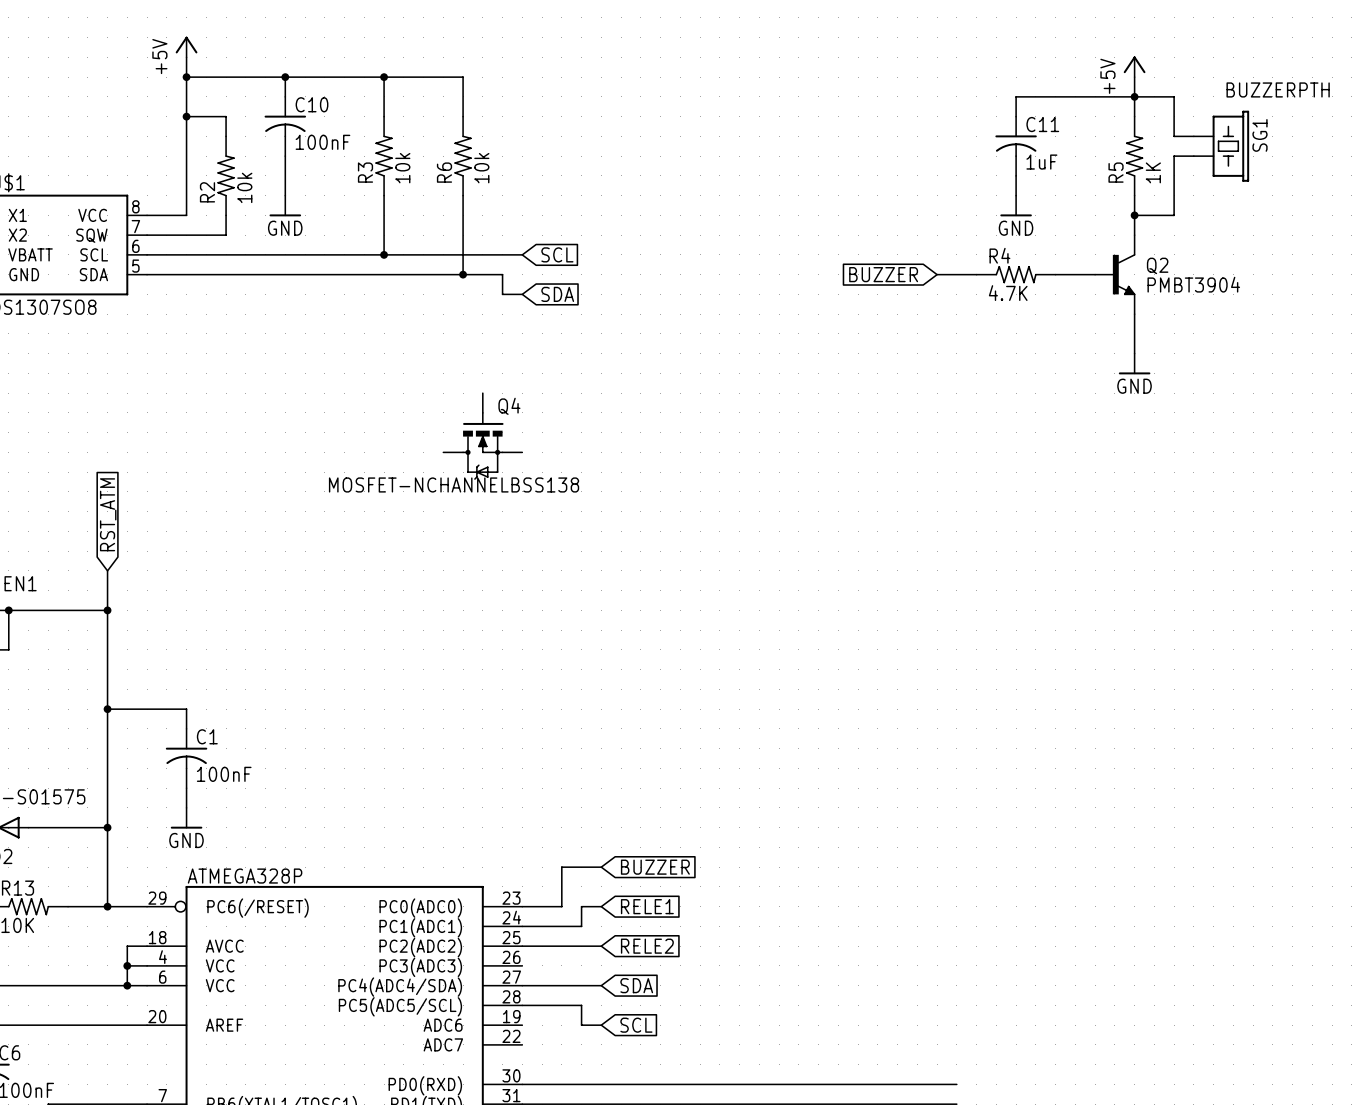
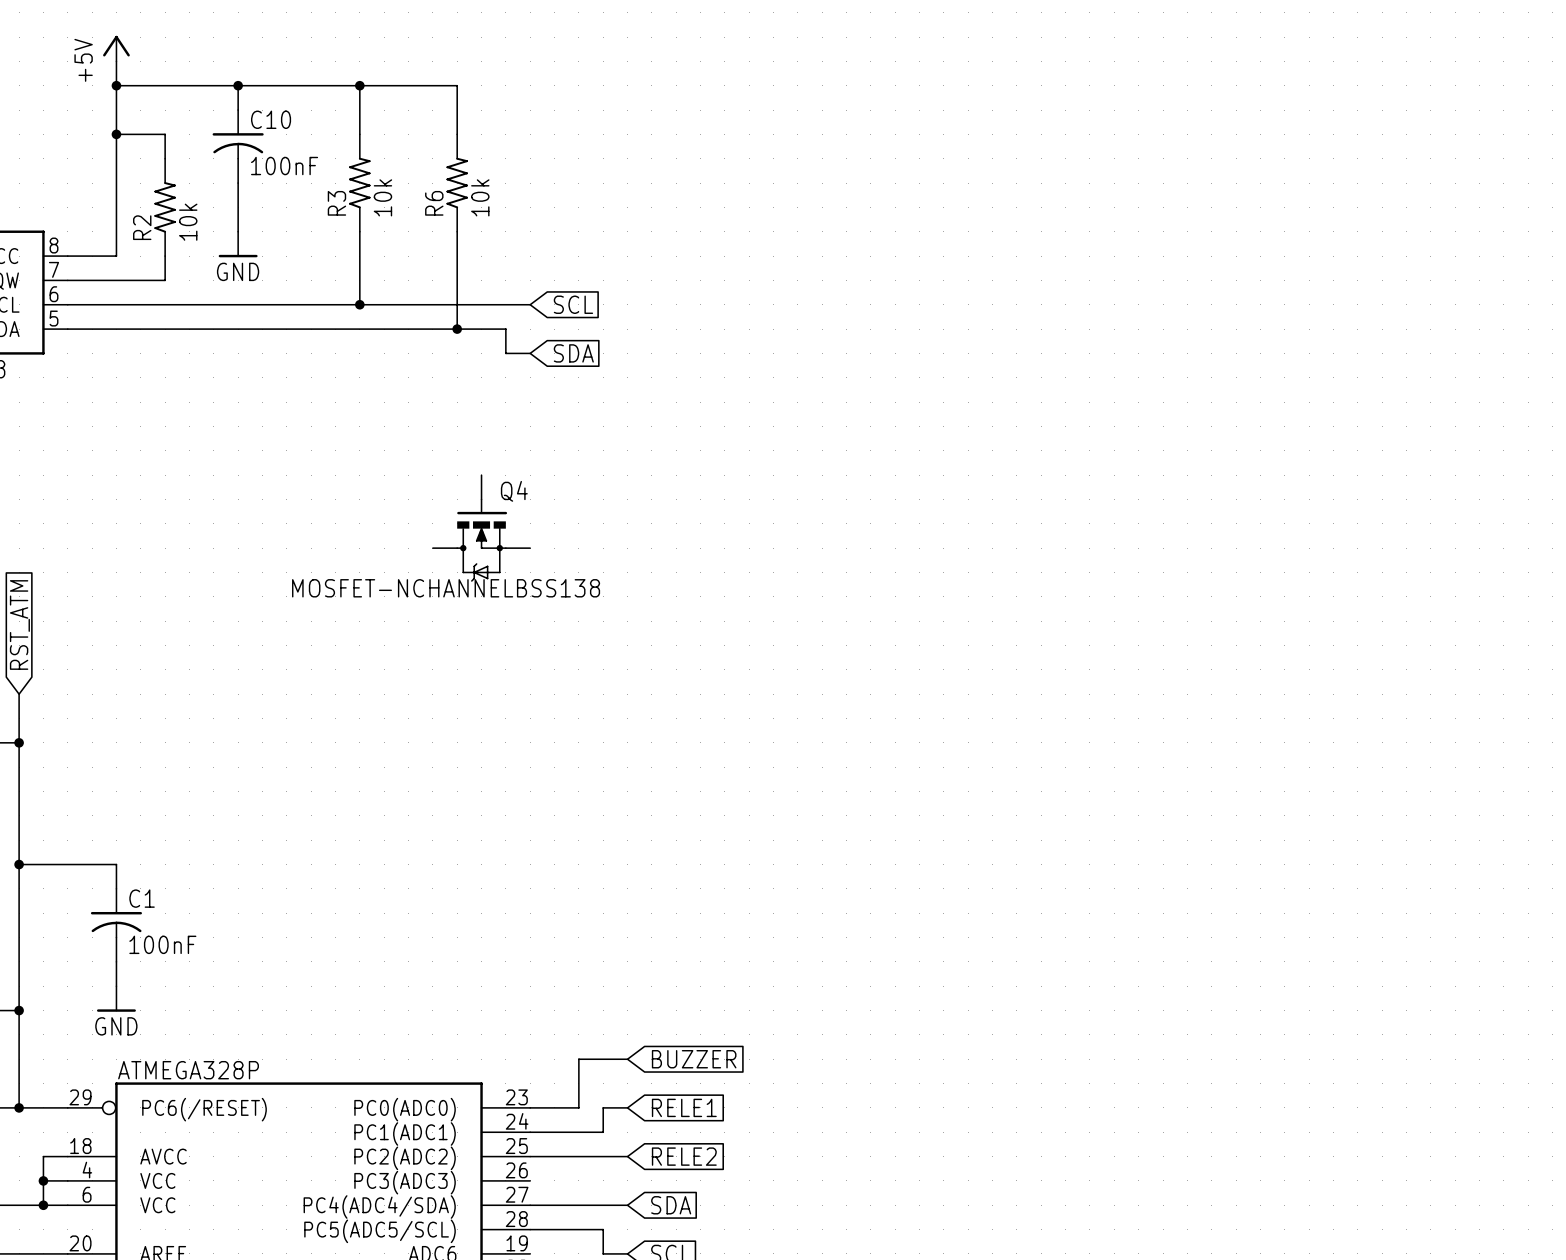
power symbol: +5V (1134, 66) -> none
wire: (1134, 77) (1134, 116) -> none
junction: (1134, 96) -> none
wire: (1016, 116) (1016, 96) (1174, 96) (1174, 136) (1193, 136) -> none
C11: 1uF (1016, 146) -> none
SG1: BUZZERPTH (1221, 146) -> none
R5: 1K (1134, 156) -> none
wire: (1193, 156) (1174, 156) (1174, 215) (1134, 215) -> none
wire: (1016, 175) (1016, 195) -> none
wire: (1134, 195) (1134, 235) -> none
power symbol: GND (1016, 206) -> none
junction: (1134, 215) -> none
global label: BUZZER (883, 274) -> none
wire: (937, 274) (976, 274) -> none
R4: 4.7K (1016, 274) -> none
wire: (1055, 274) (1095, 274) -> none
Q2: PMBT3904 (1115, 274) -> none
wire: (1134, 314) (1134, 353) -> none
power symbol: GND (1134, 364) -> none

